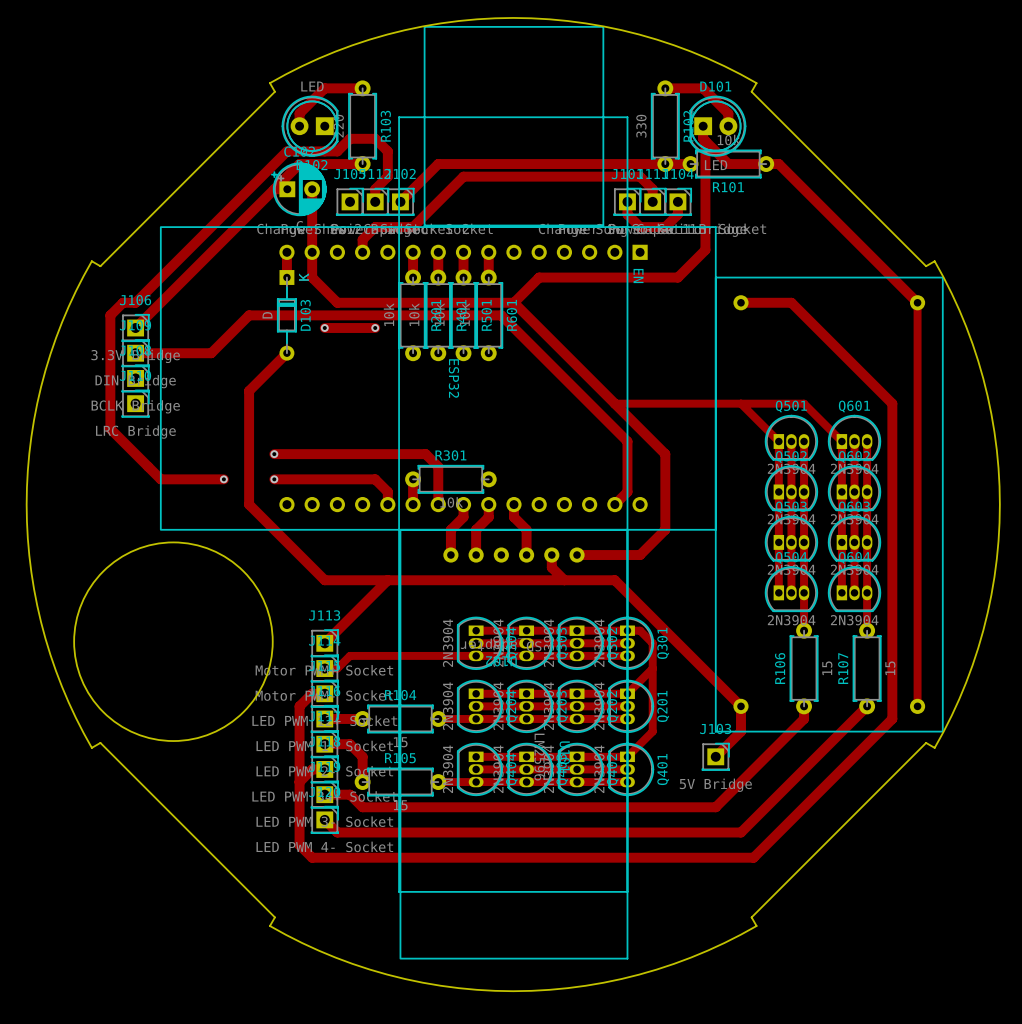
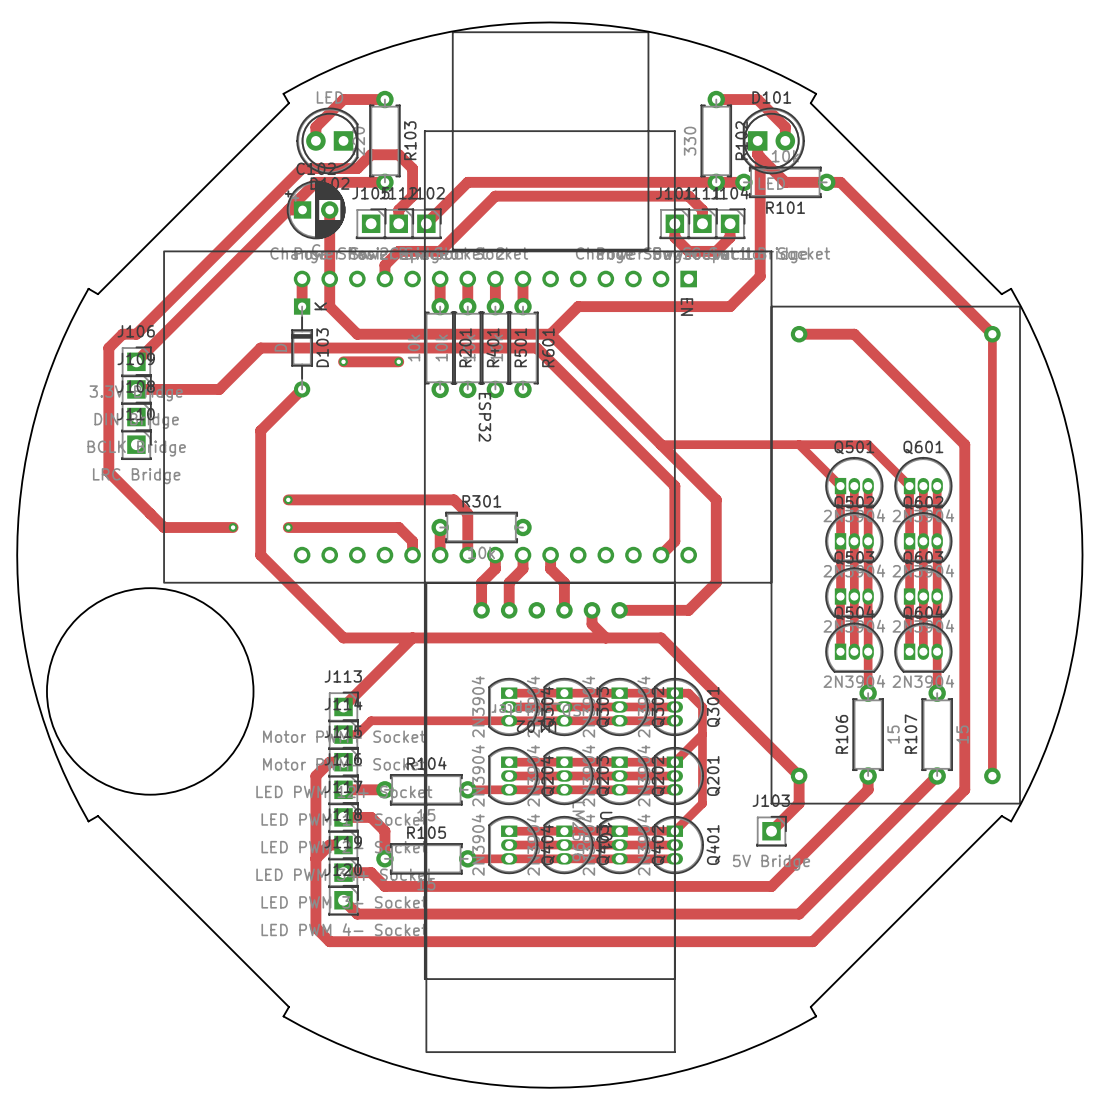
round board edge: none -> [46, 587, 255, 796]
round board edge: [73, 541, 274, 742] -> none

